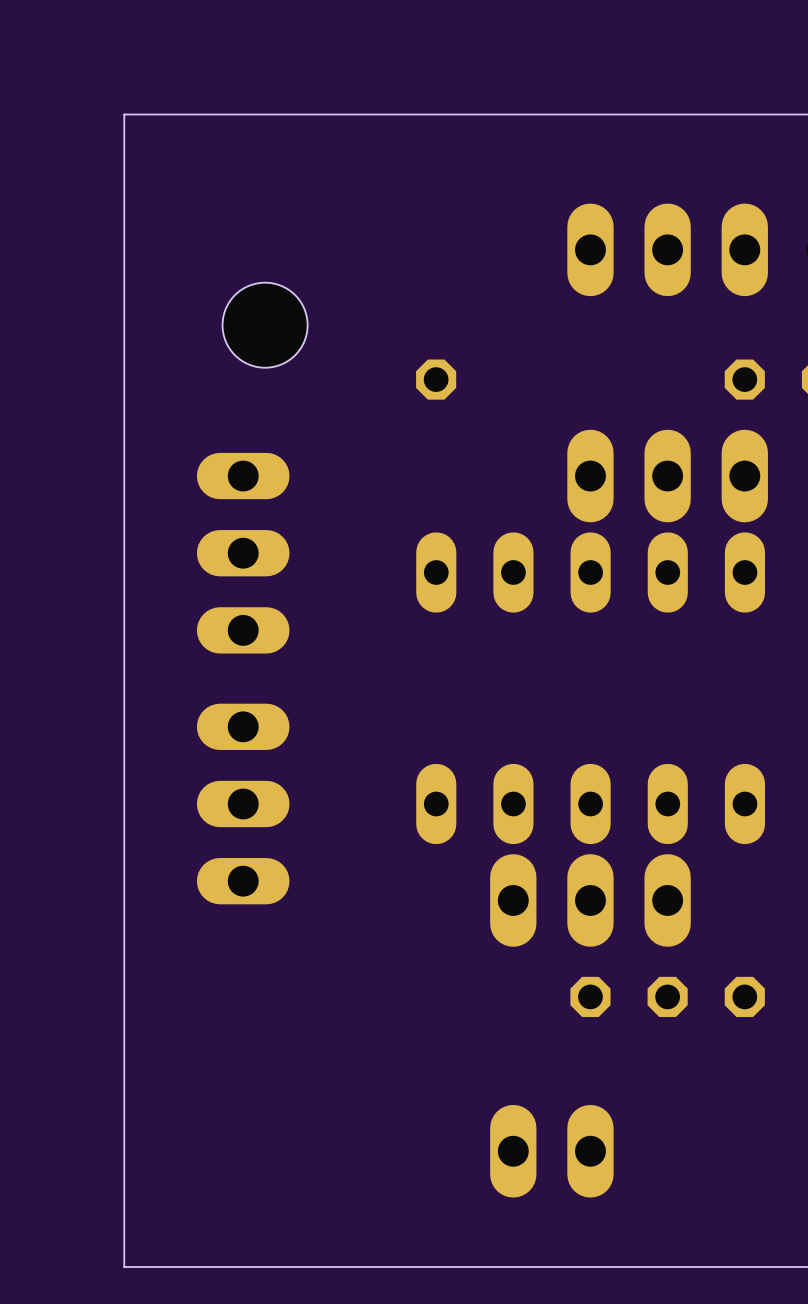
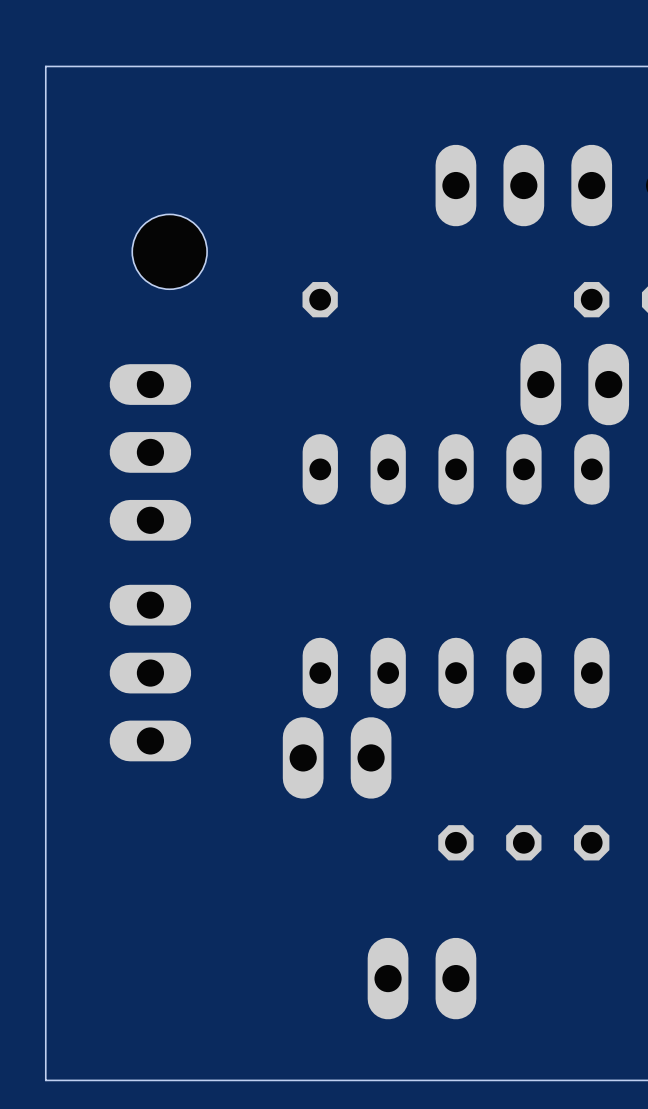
part: (667, 476) -> none
part: none -> (574, 384)
part: none -> (337, 757)
part: (590, 900) -> none

